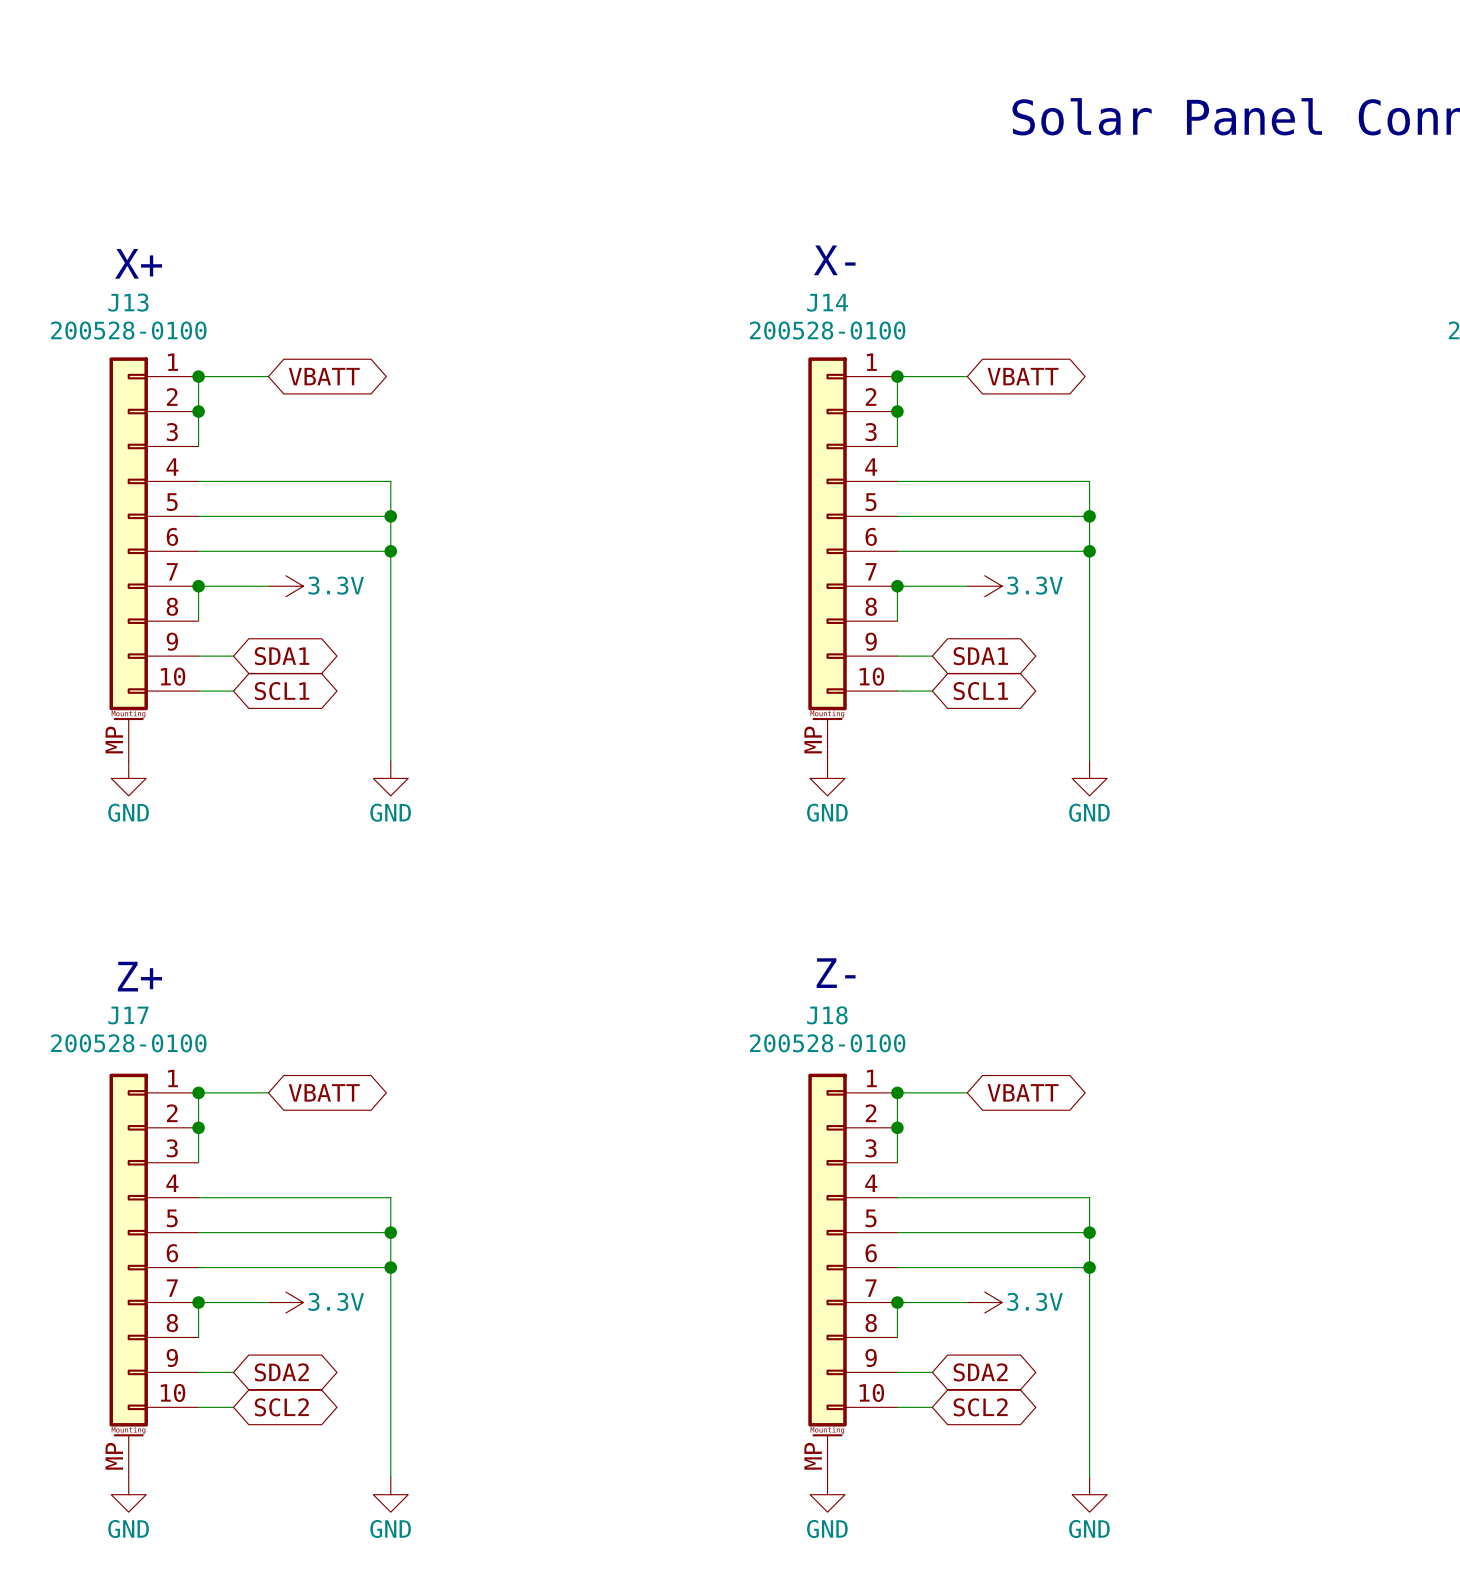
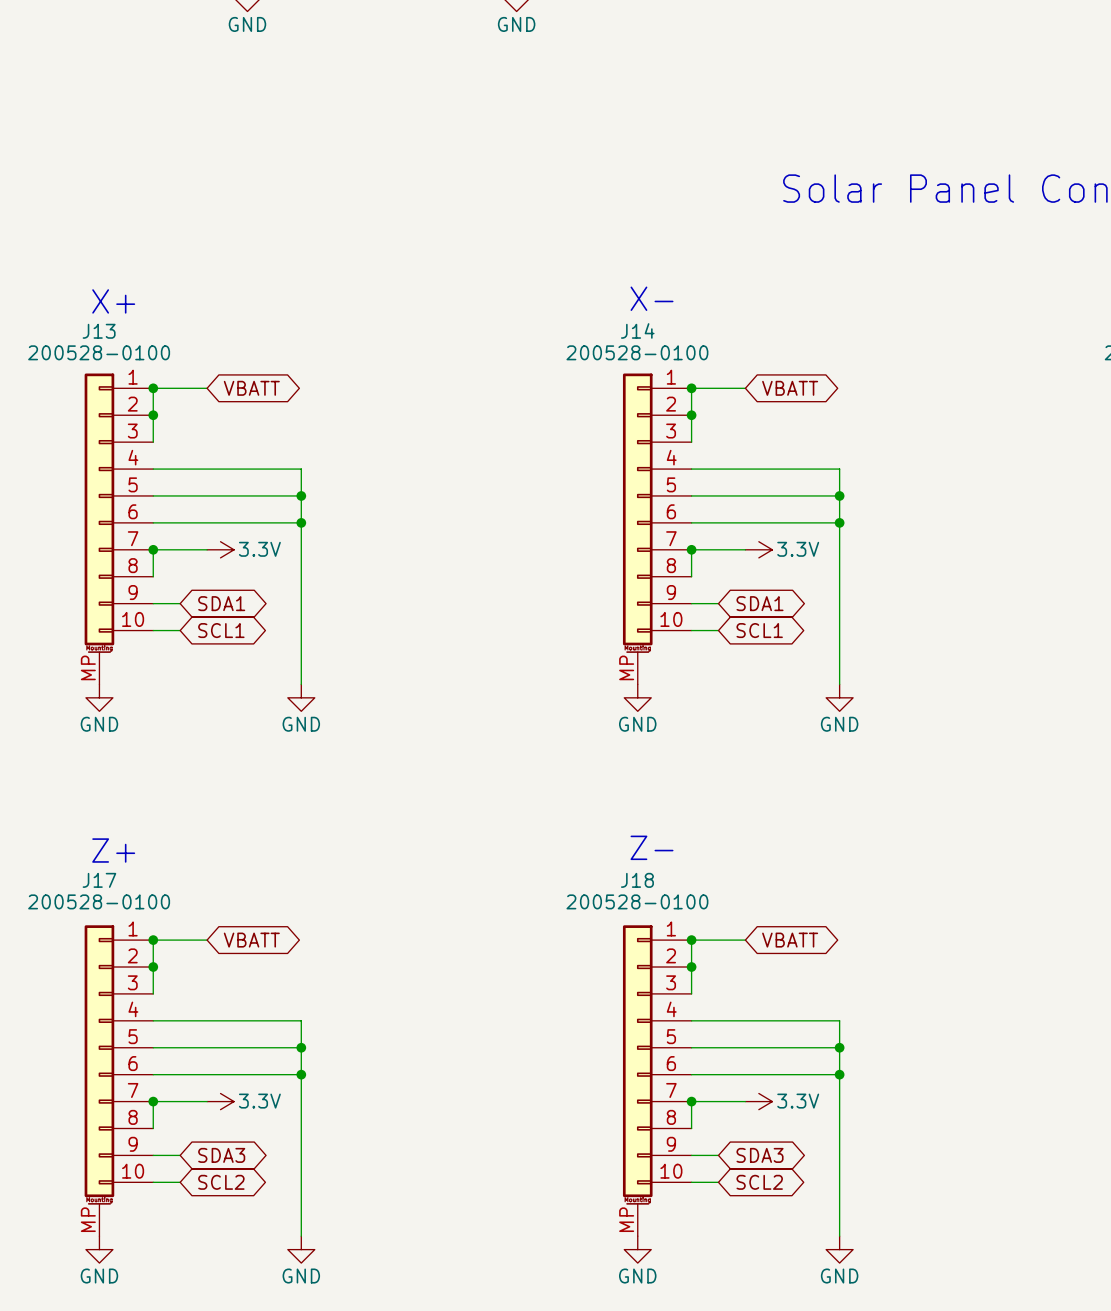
global label: SDA2 (281, 1372) -> SDA3 (221, 1155)
global label: SDA2 (980, 1372) -> SDA3 (760, 1155)

